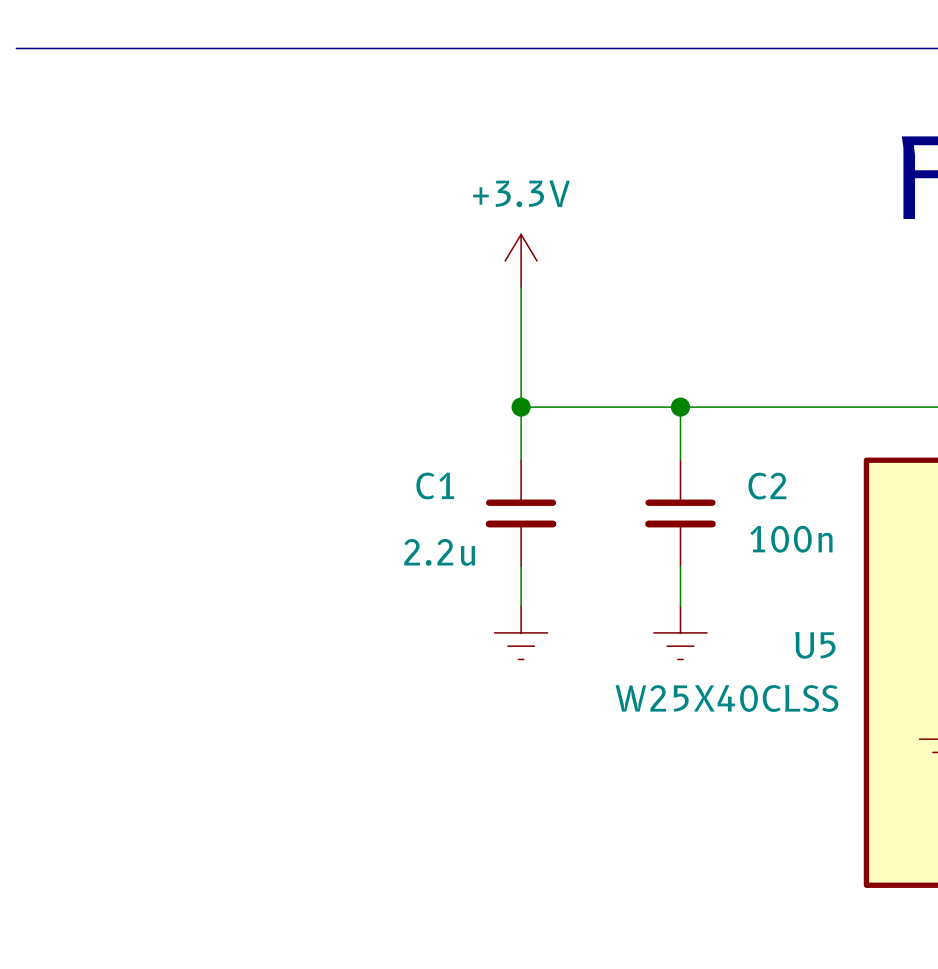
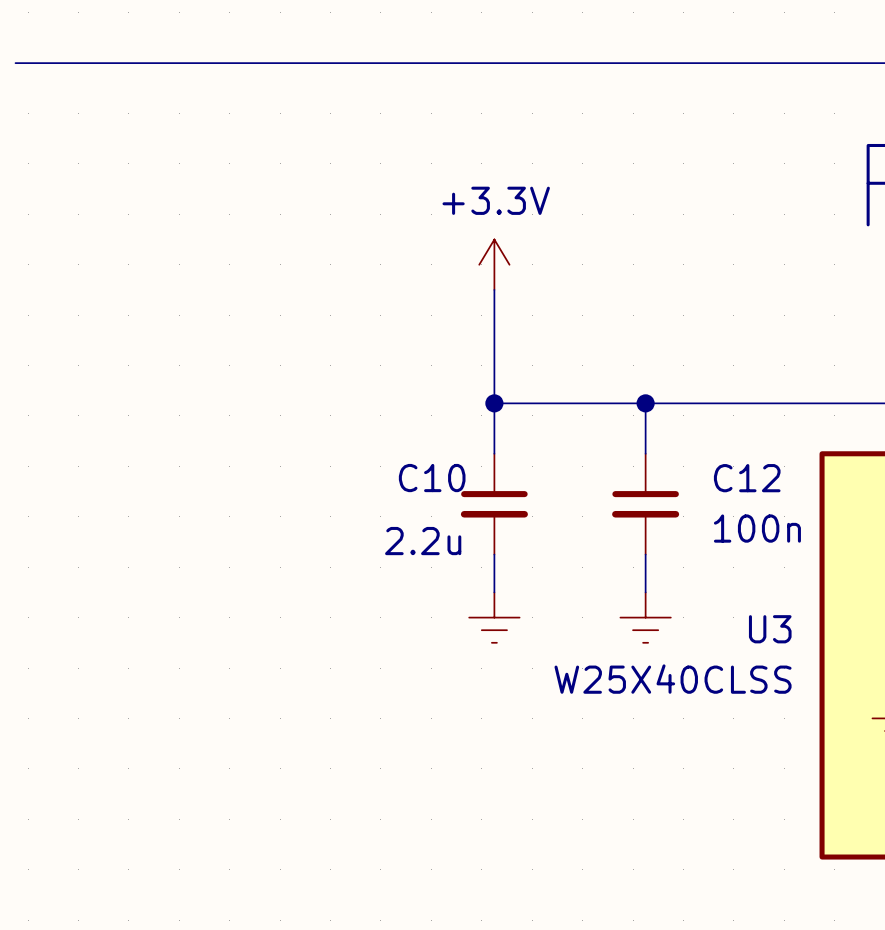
C1 name: C1 (435, 485) -> C10 (432, 478)
C2 name: C2 (767, 486) -> C12 (747, 478)
U5 name: U5 (815, 645) -> U3 (770, 629)

